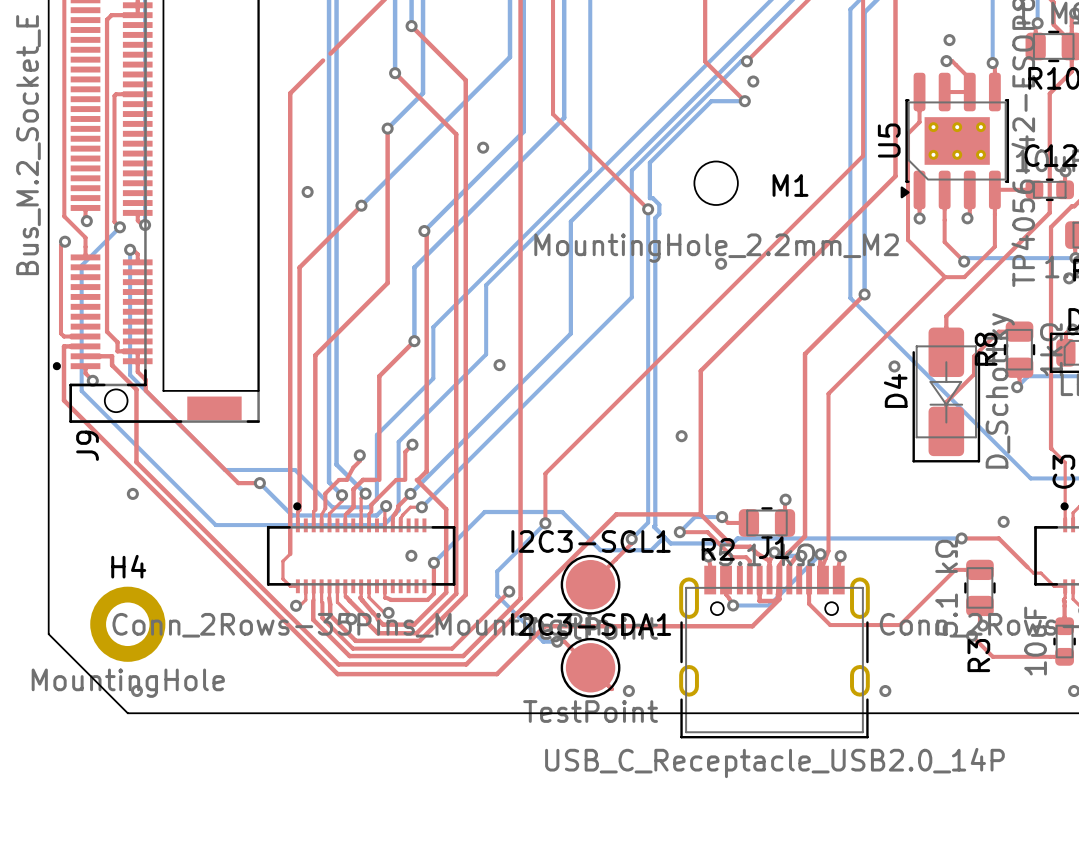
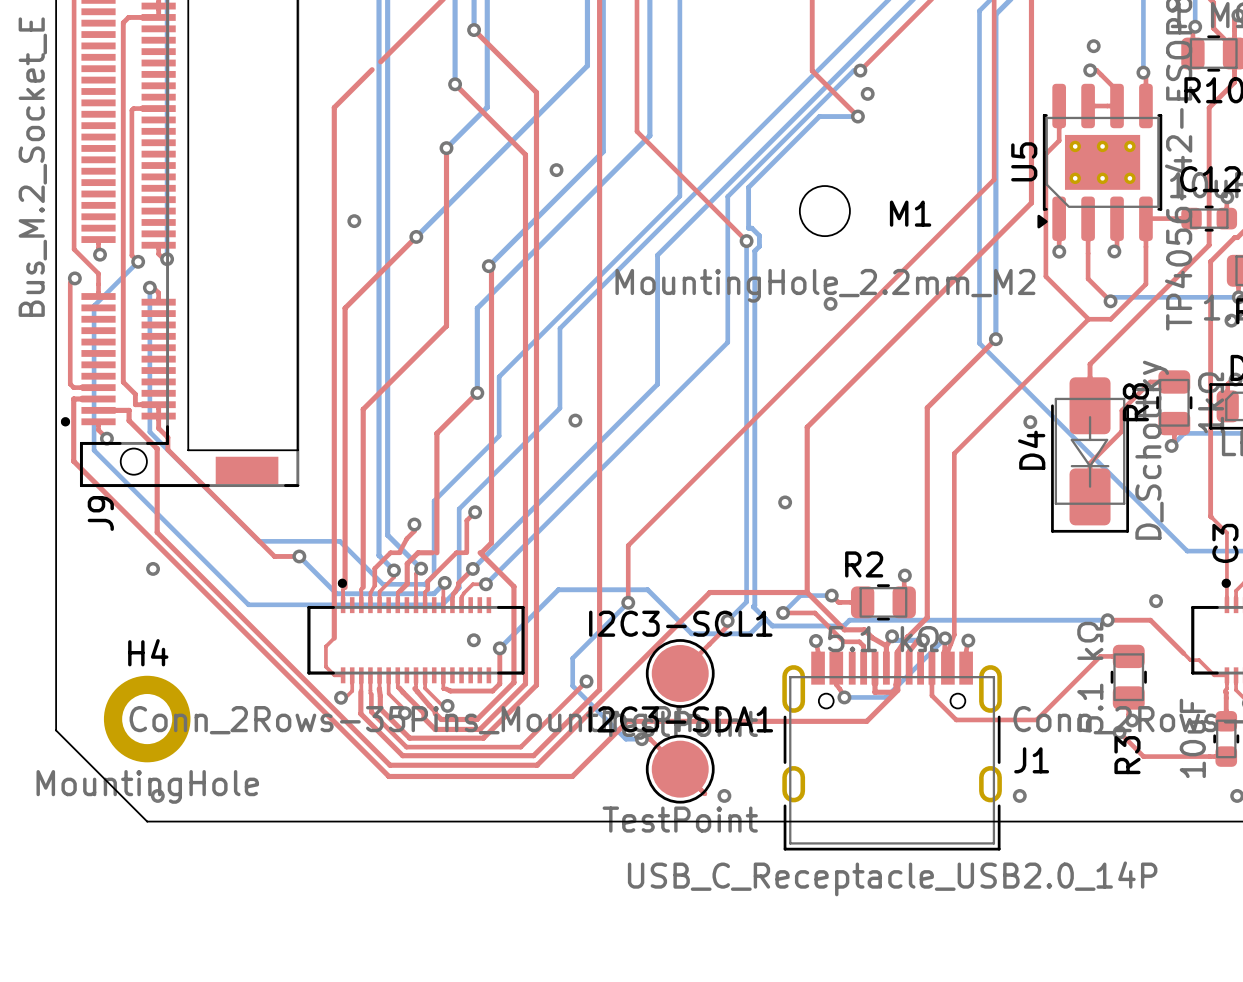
J1 name position: J1 (774, 547) -> J1 (1031, 760)
R2 name position: R2 (718, 549) -> R2 (864, 564)

